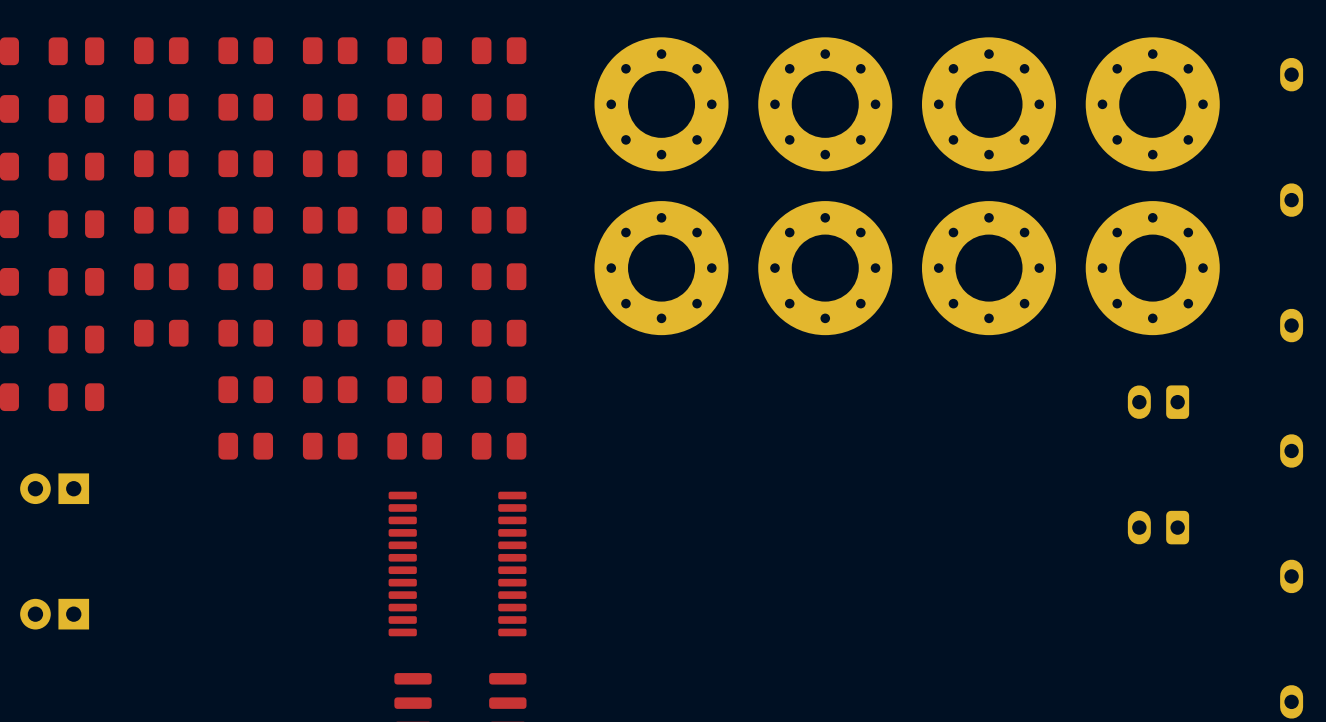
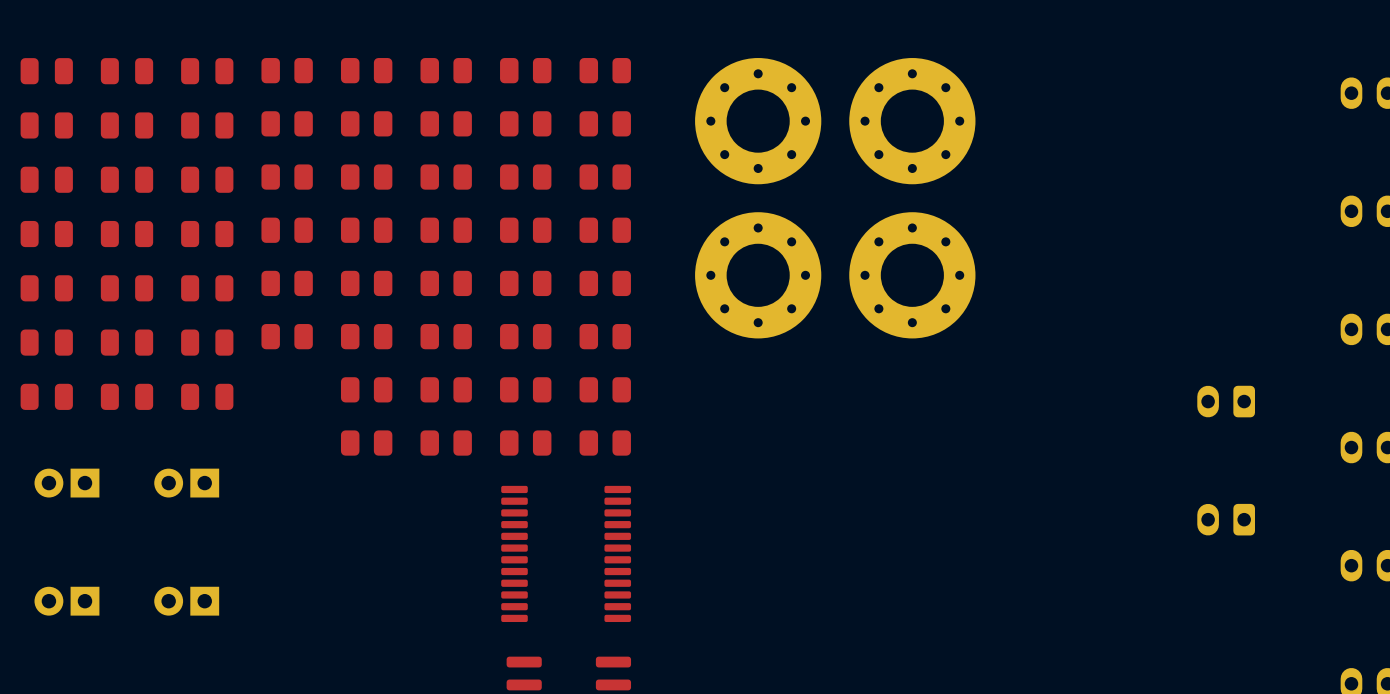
part: (989, 104) -> none
part: (1152, 104) -> none
part: (989, 268) -> none
part: (1152, 268) -> none

